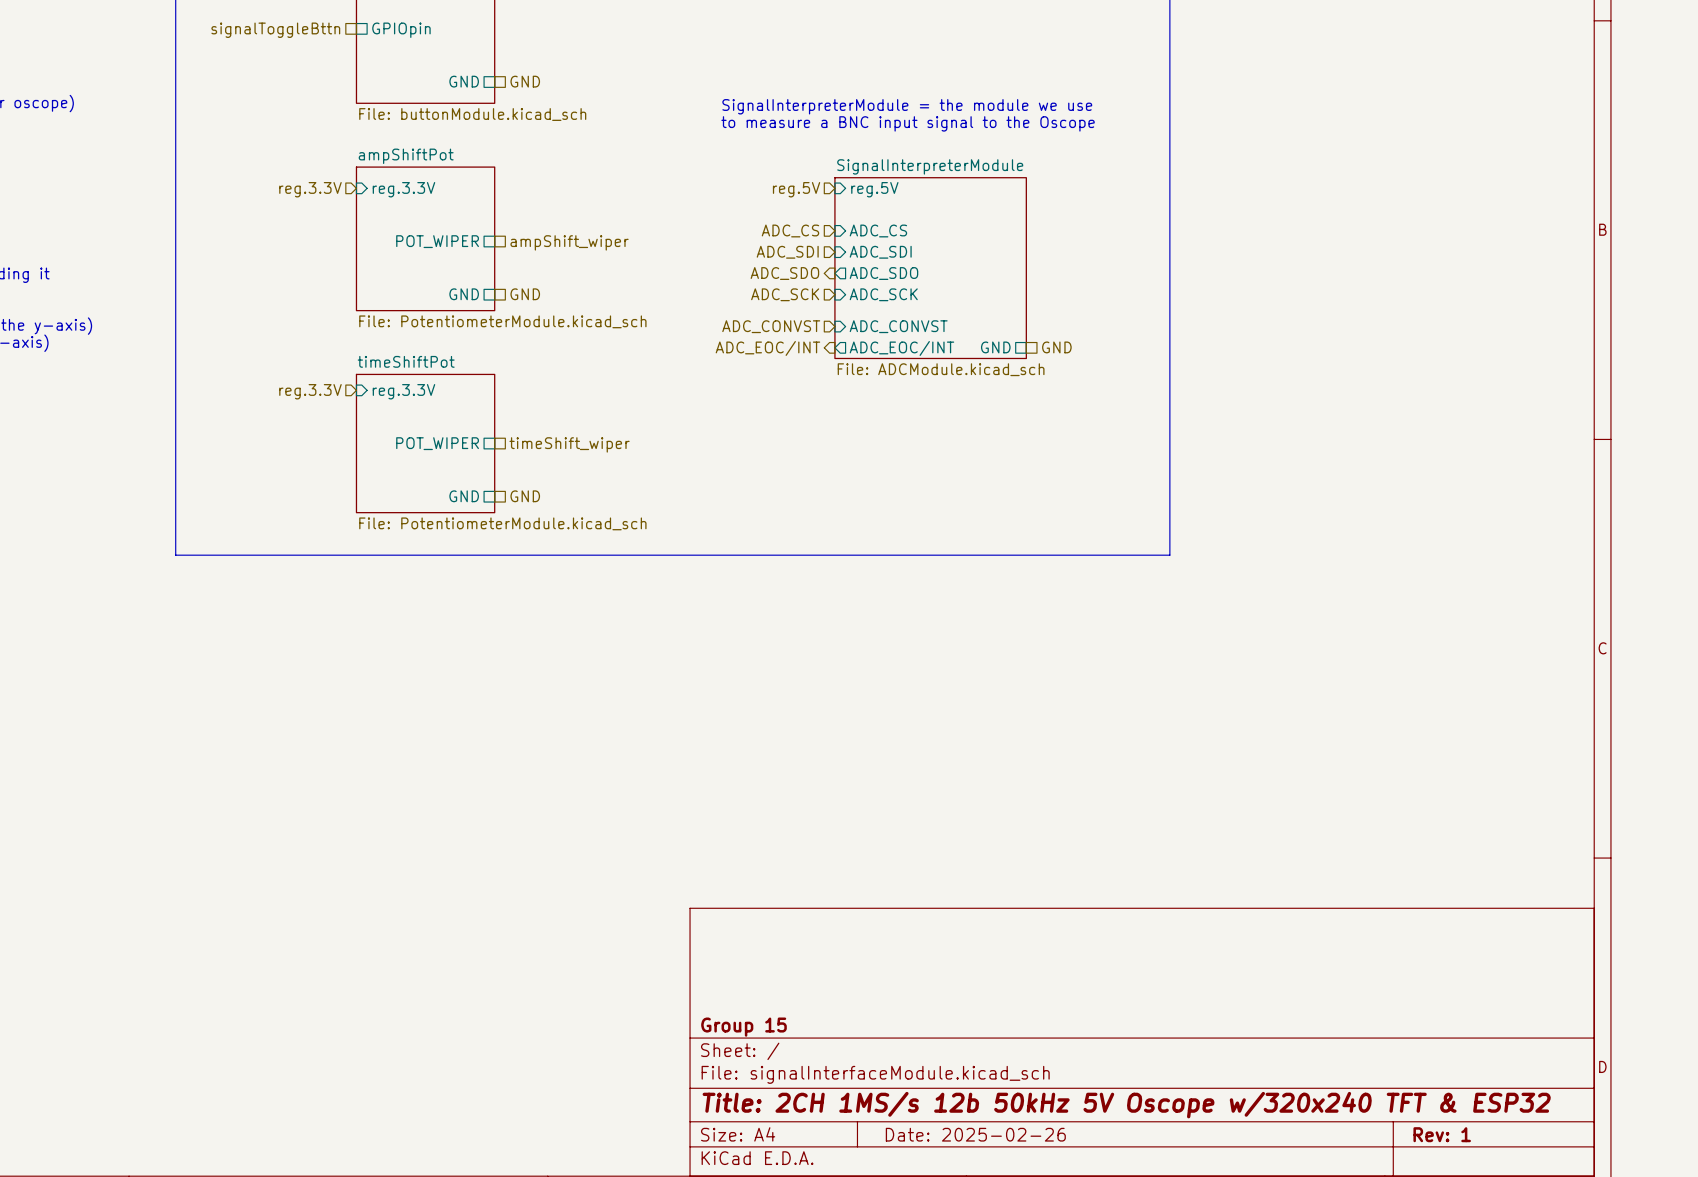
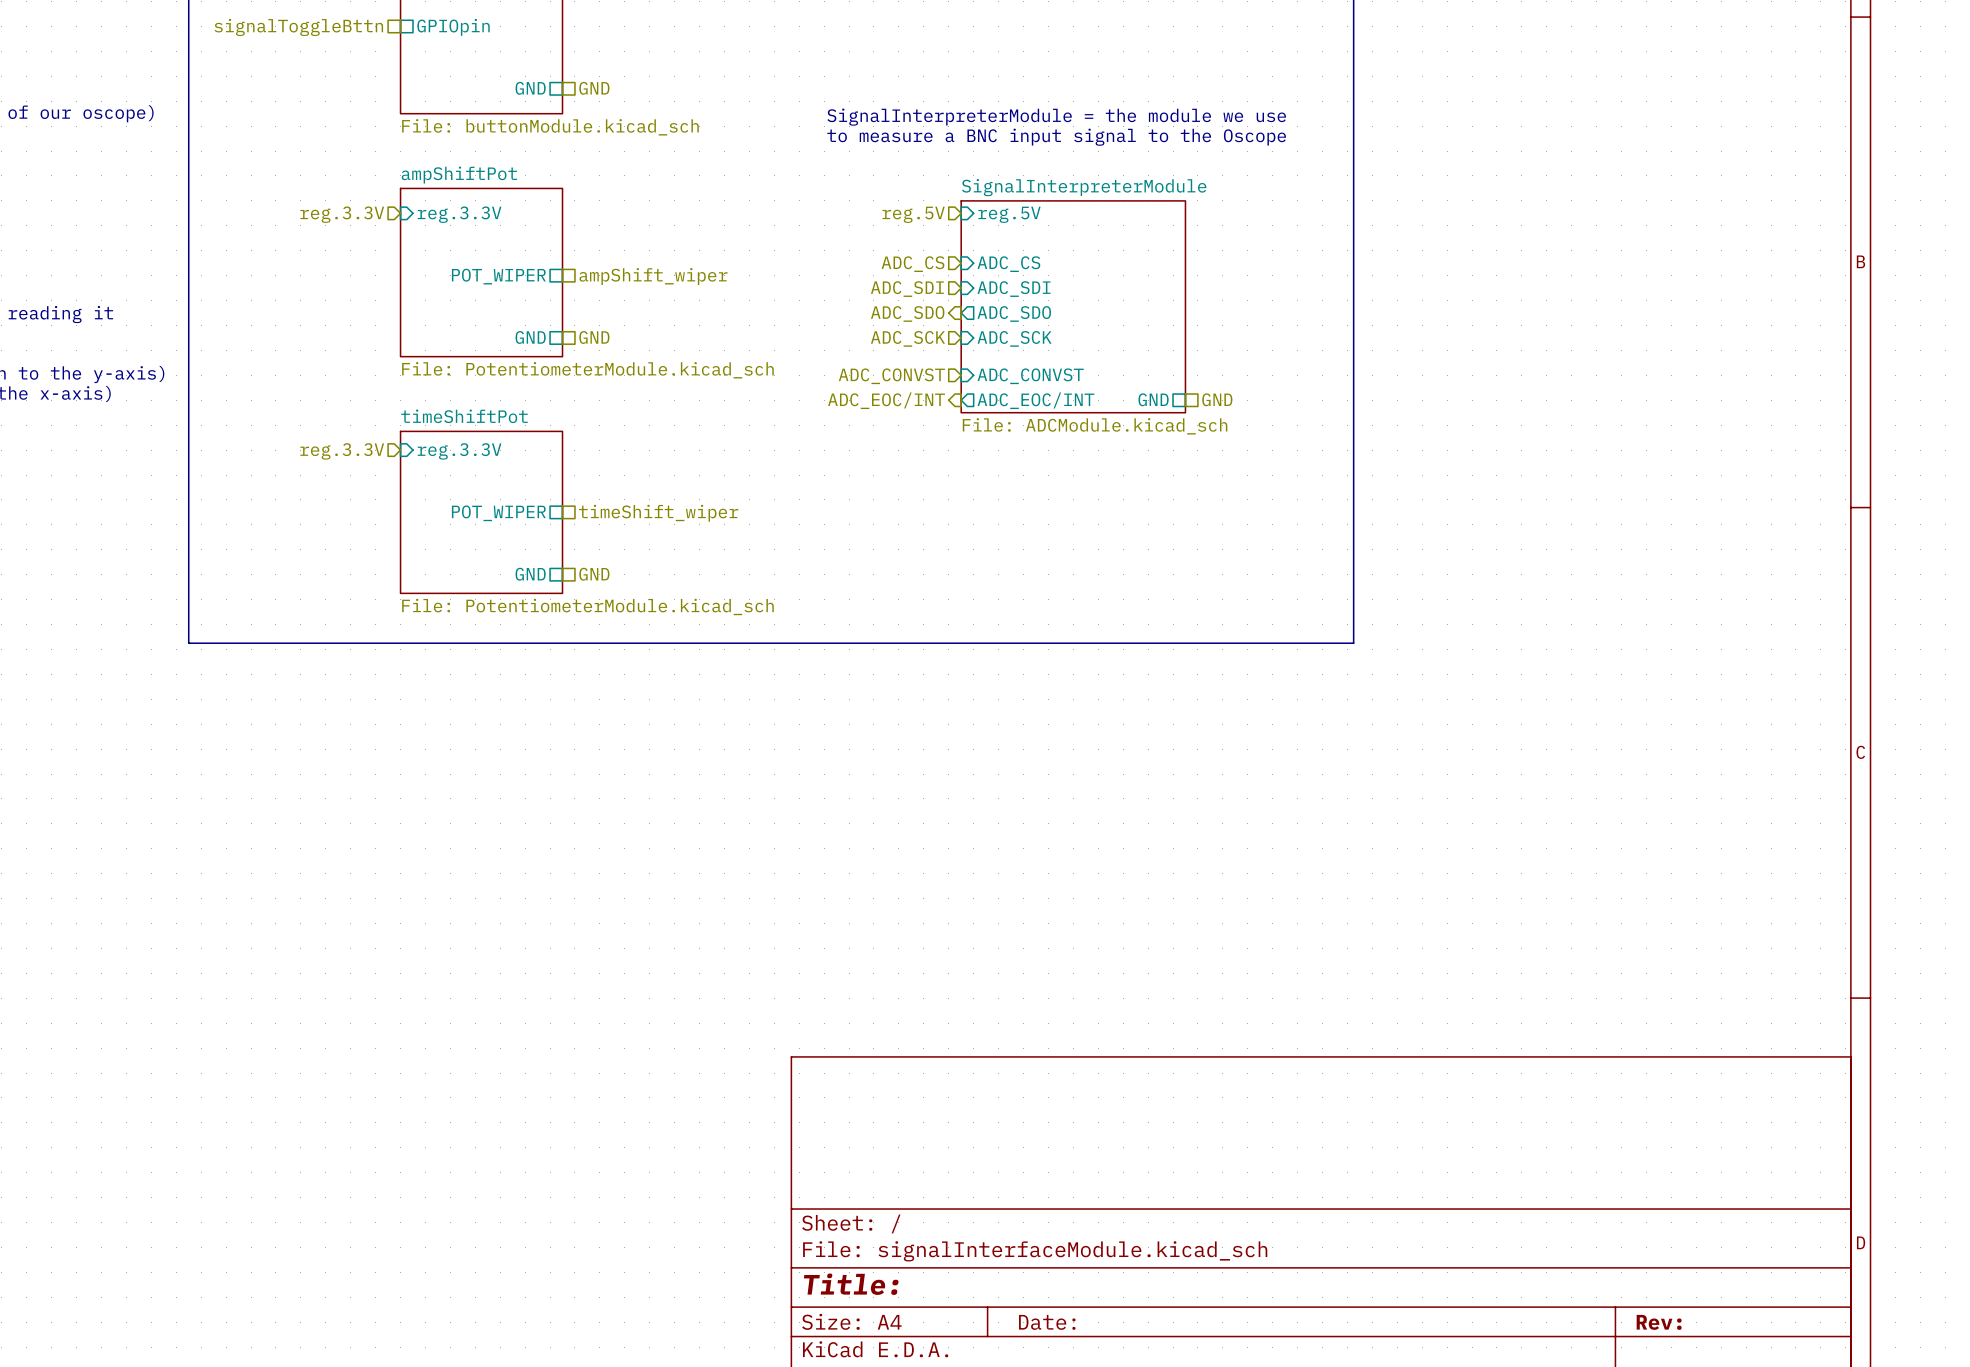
title block: Group 15 (744, 1027) -> none
title block: Title: 2CH 1MS/s 12b 50kHz 5V Oscope w/320x240 TFT & ESP32 (1126, 1105) -> Title: (851, 1284)
title block: Date: 2025-02-26 (975, 1134) -> Date: (1047, 1322)
title block: Rev: 1 (1442, 1134) -> Rev: (1659, 1322)

